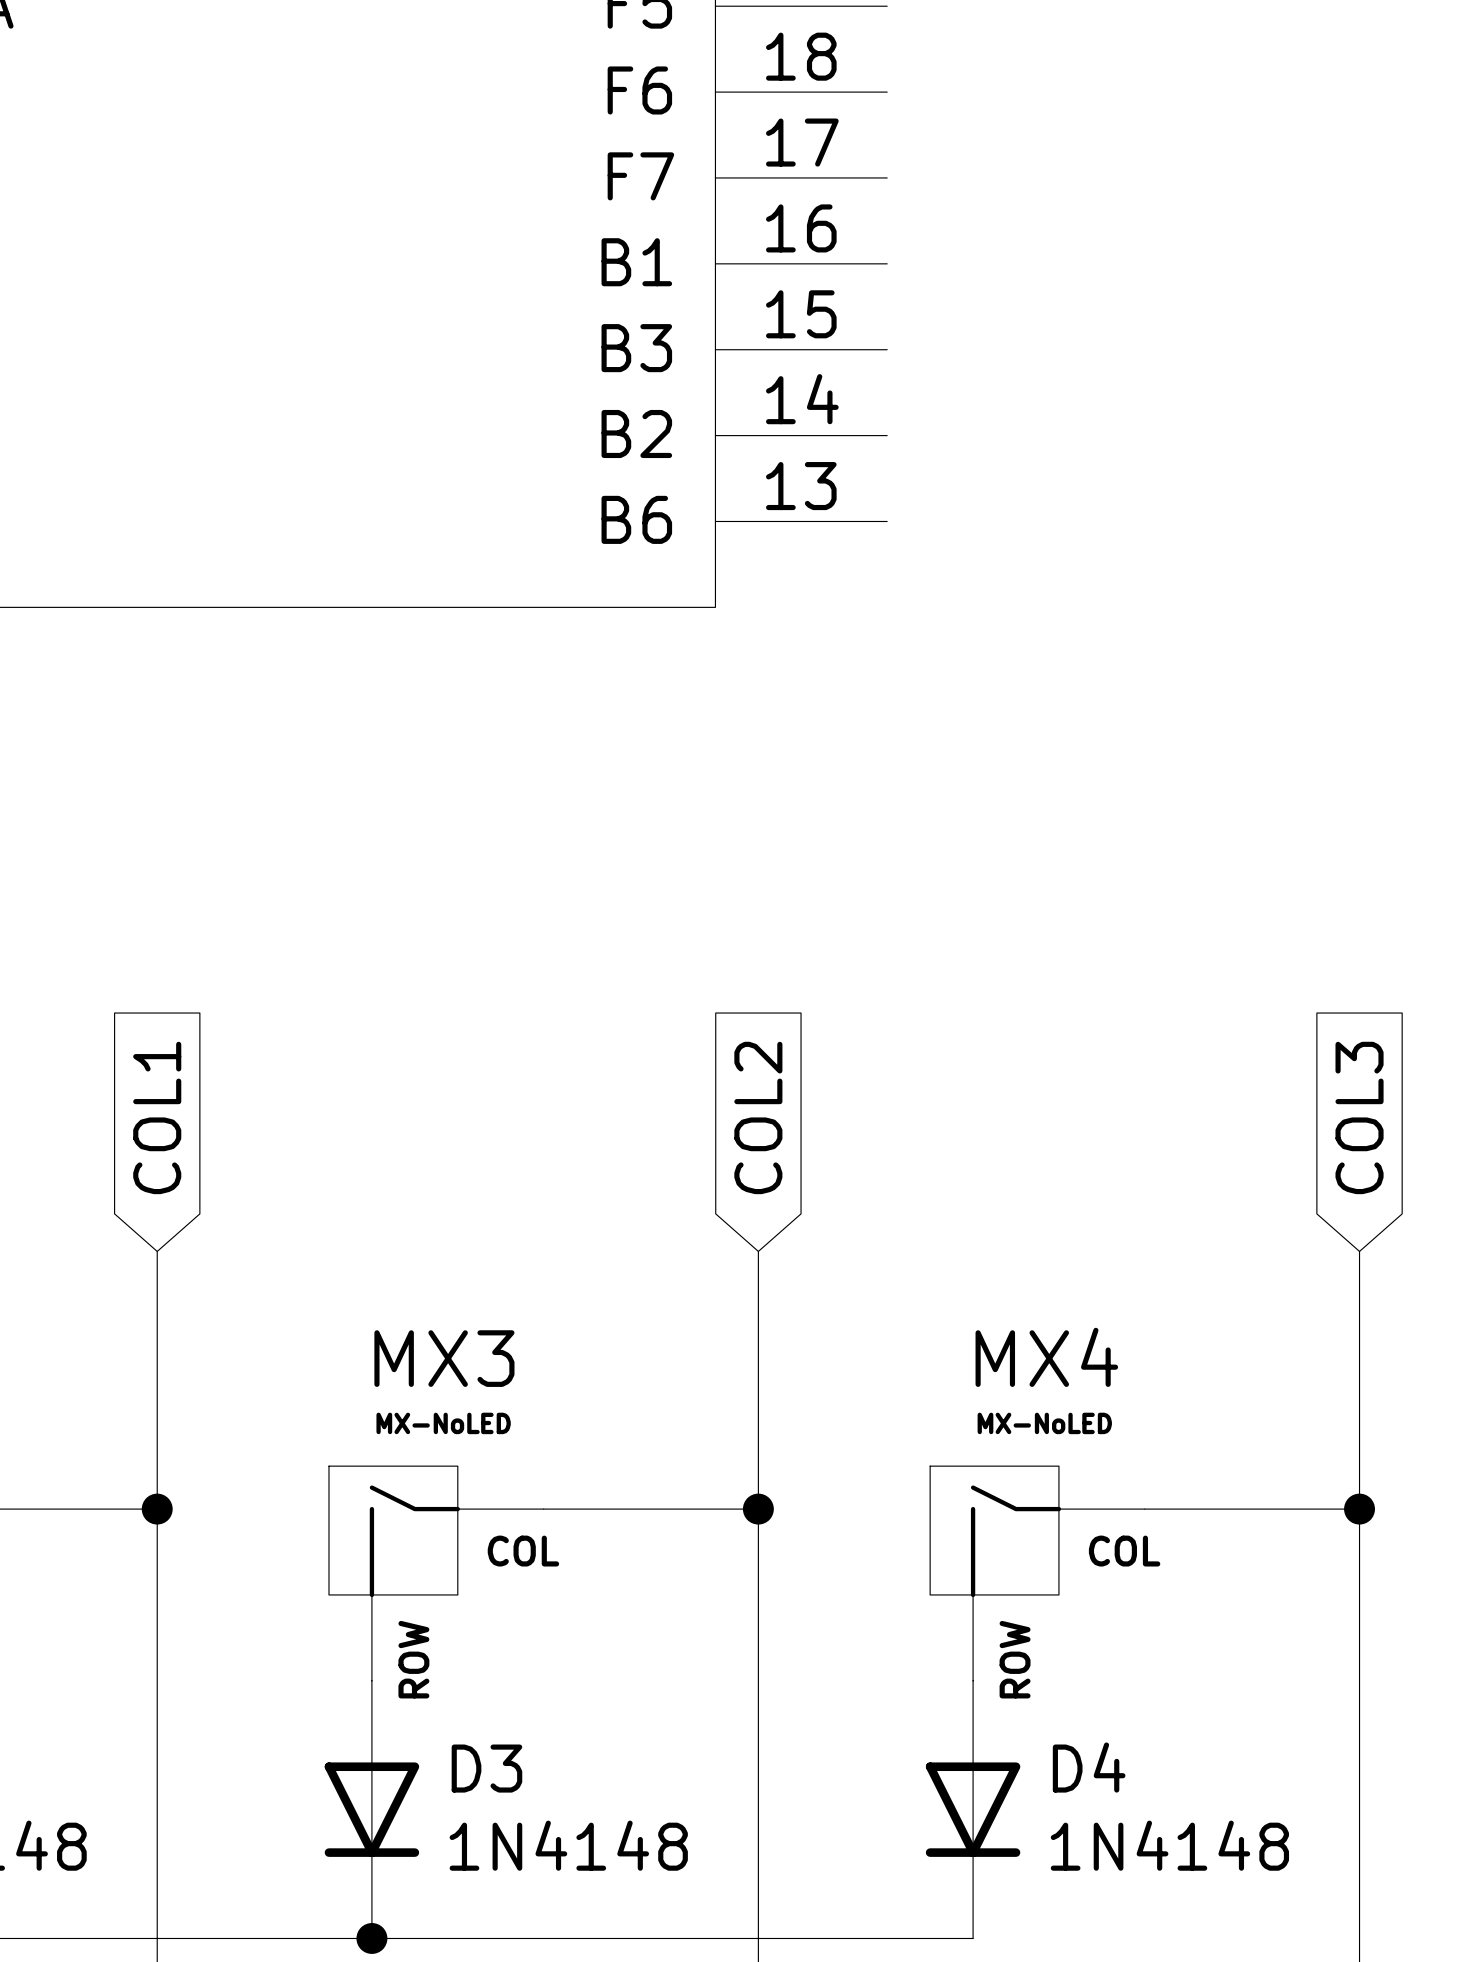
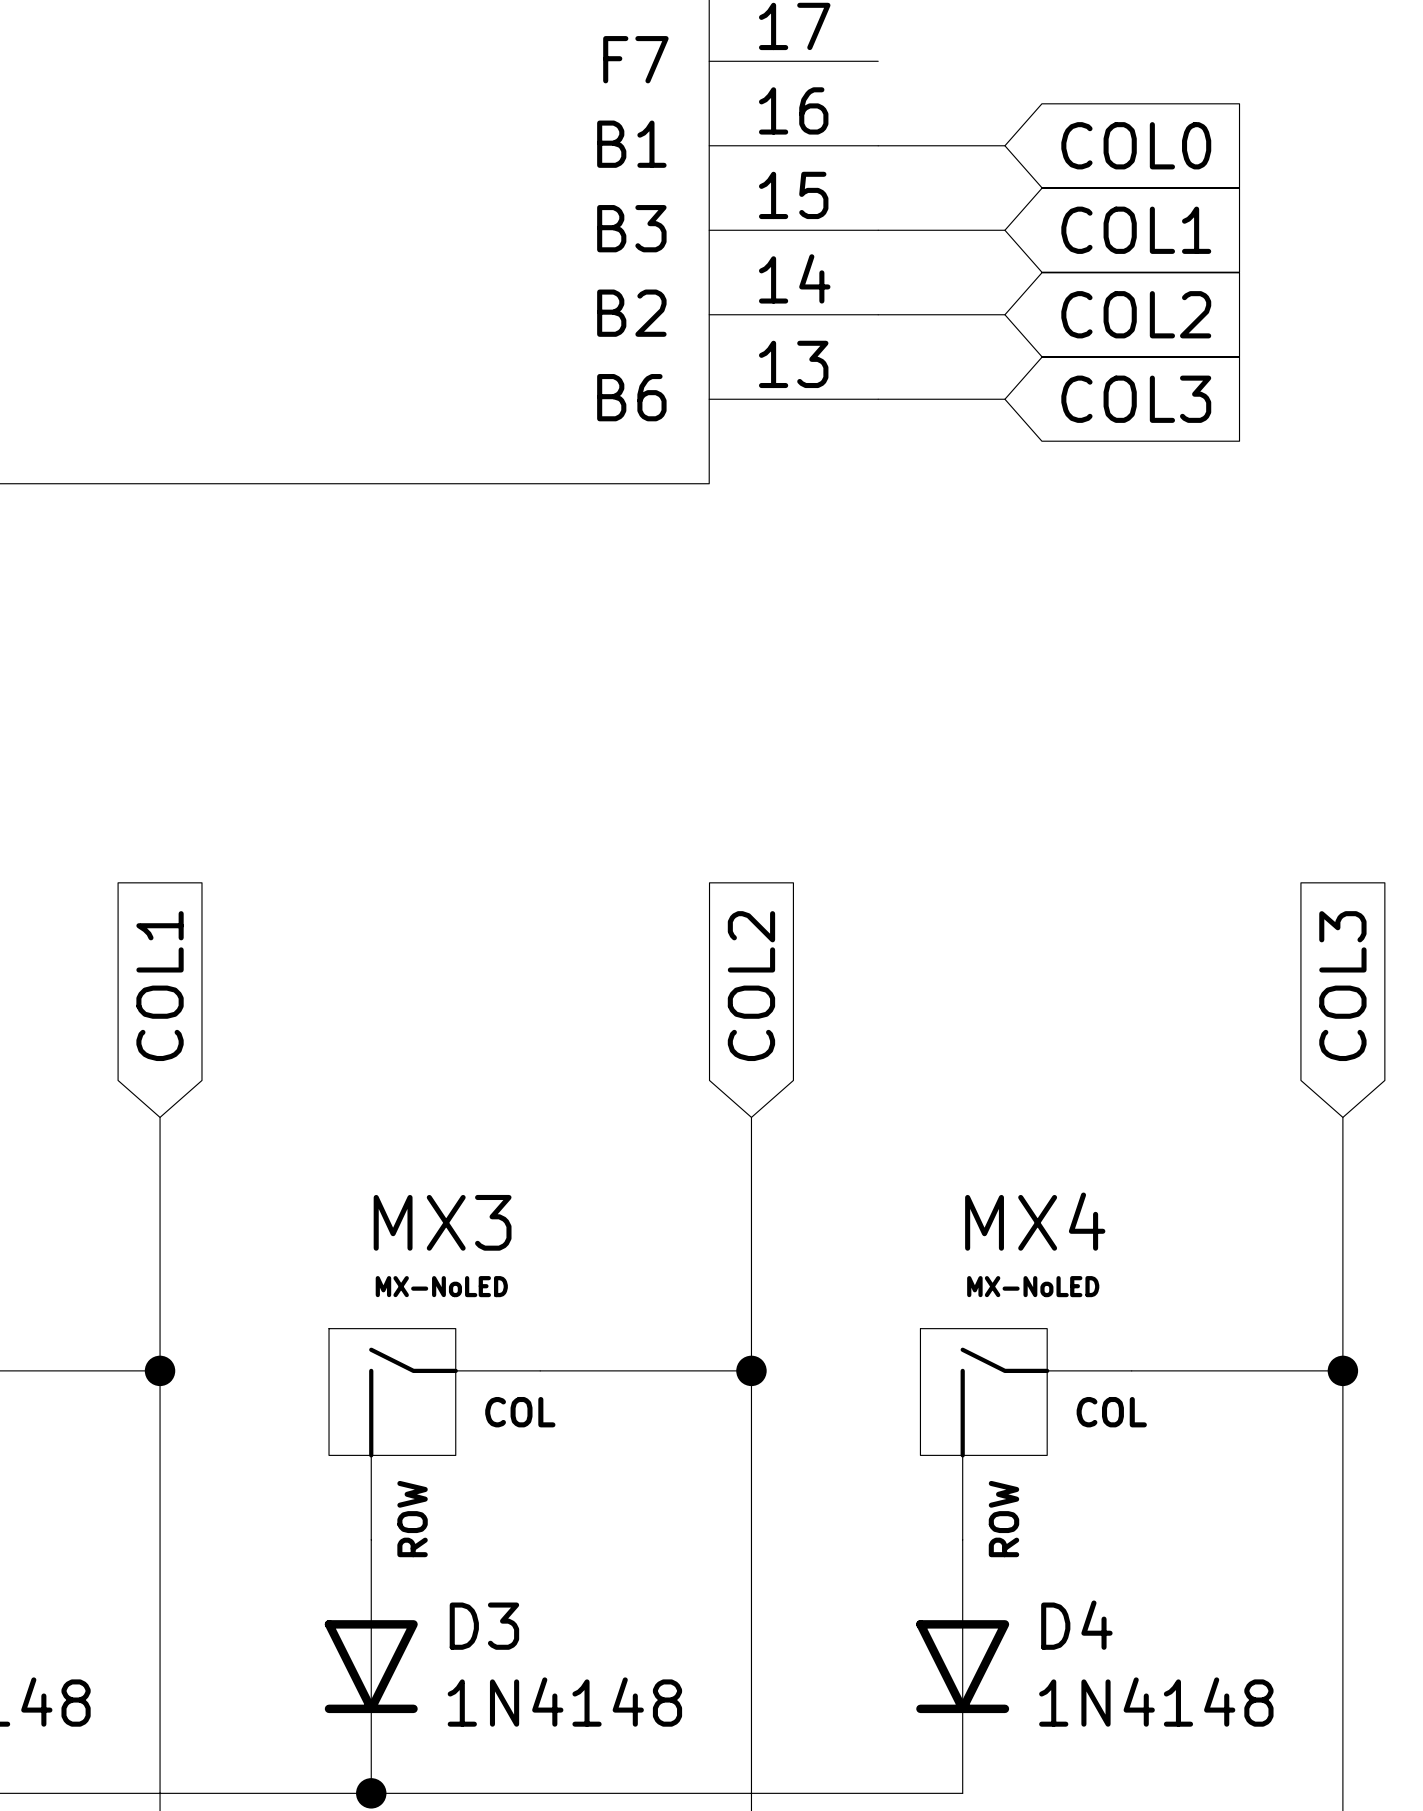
wire: none -> (878, 145) (1004, 145)
global label: none -> COL0 (1136, 145)
wire: none -> (878, 230) (1004, 230)
global label: none -> COL1 (1136, 230)
wire: none -> (878, 314) (1004, 314)
global label: none -> COL2 (1136, 314)
wire: none -> (878, 399) (1004, 399)
global label: none -> COL3 (1136, 399)

